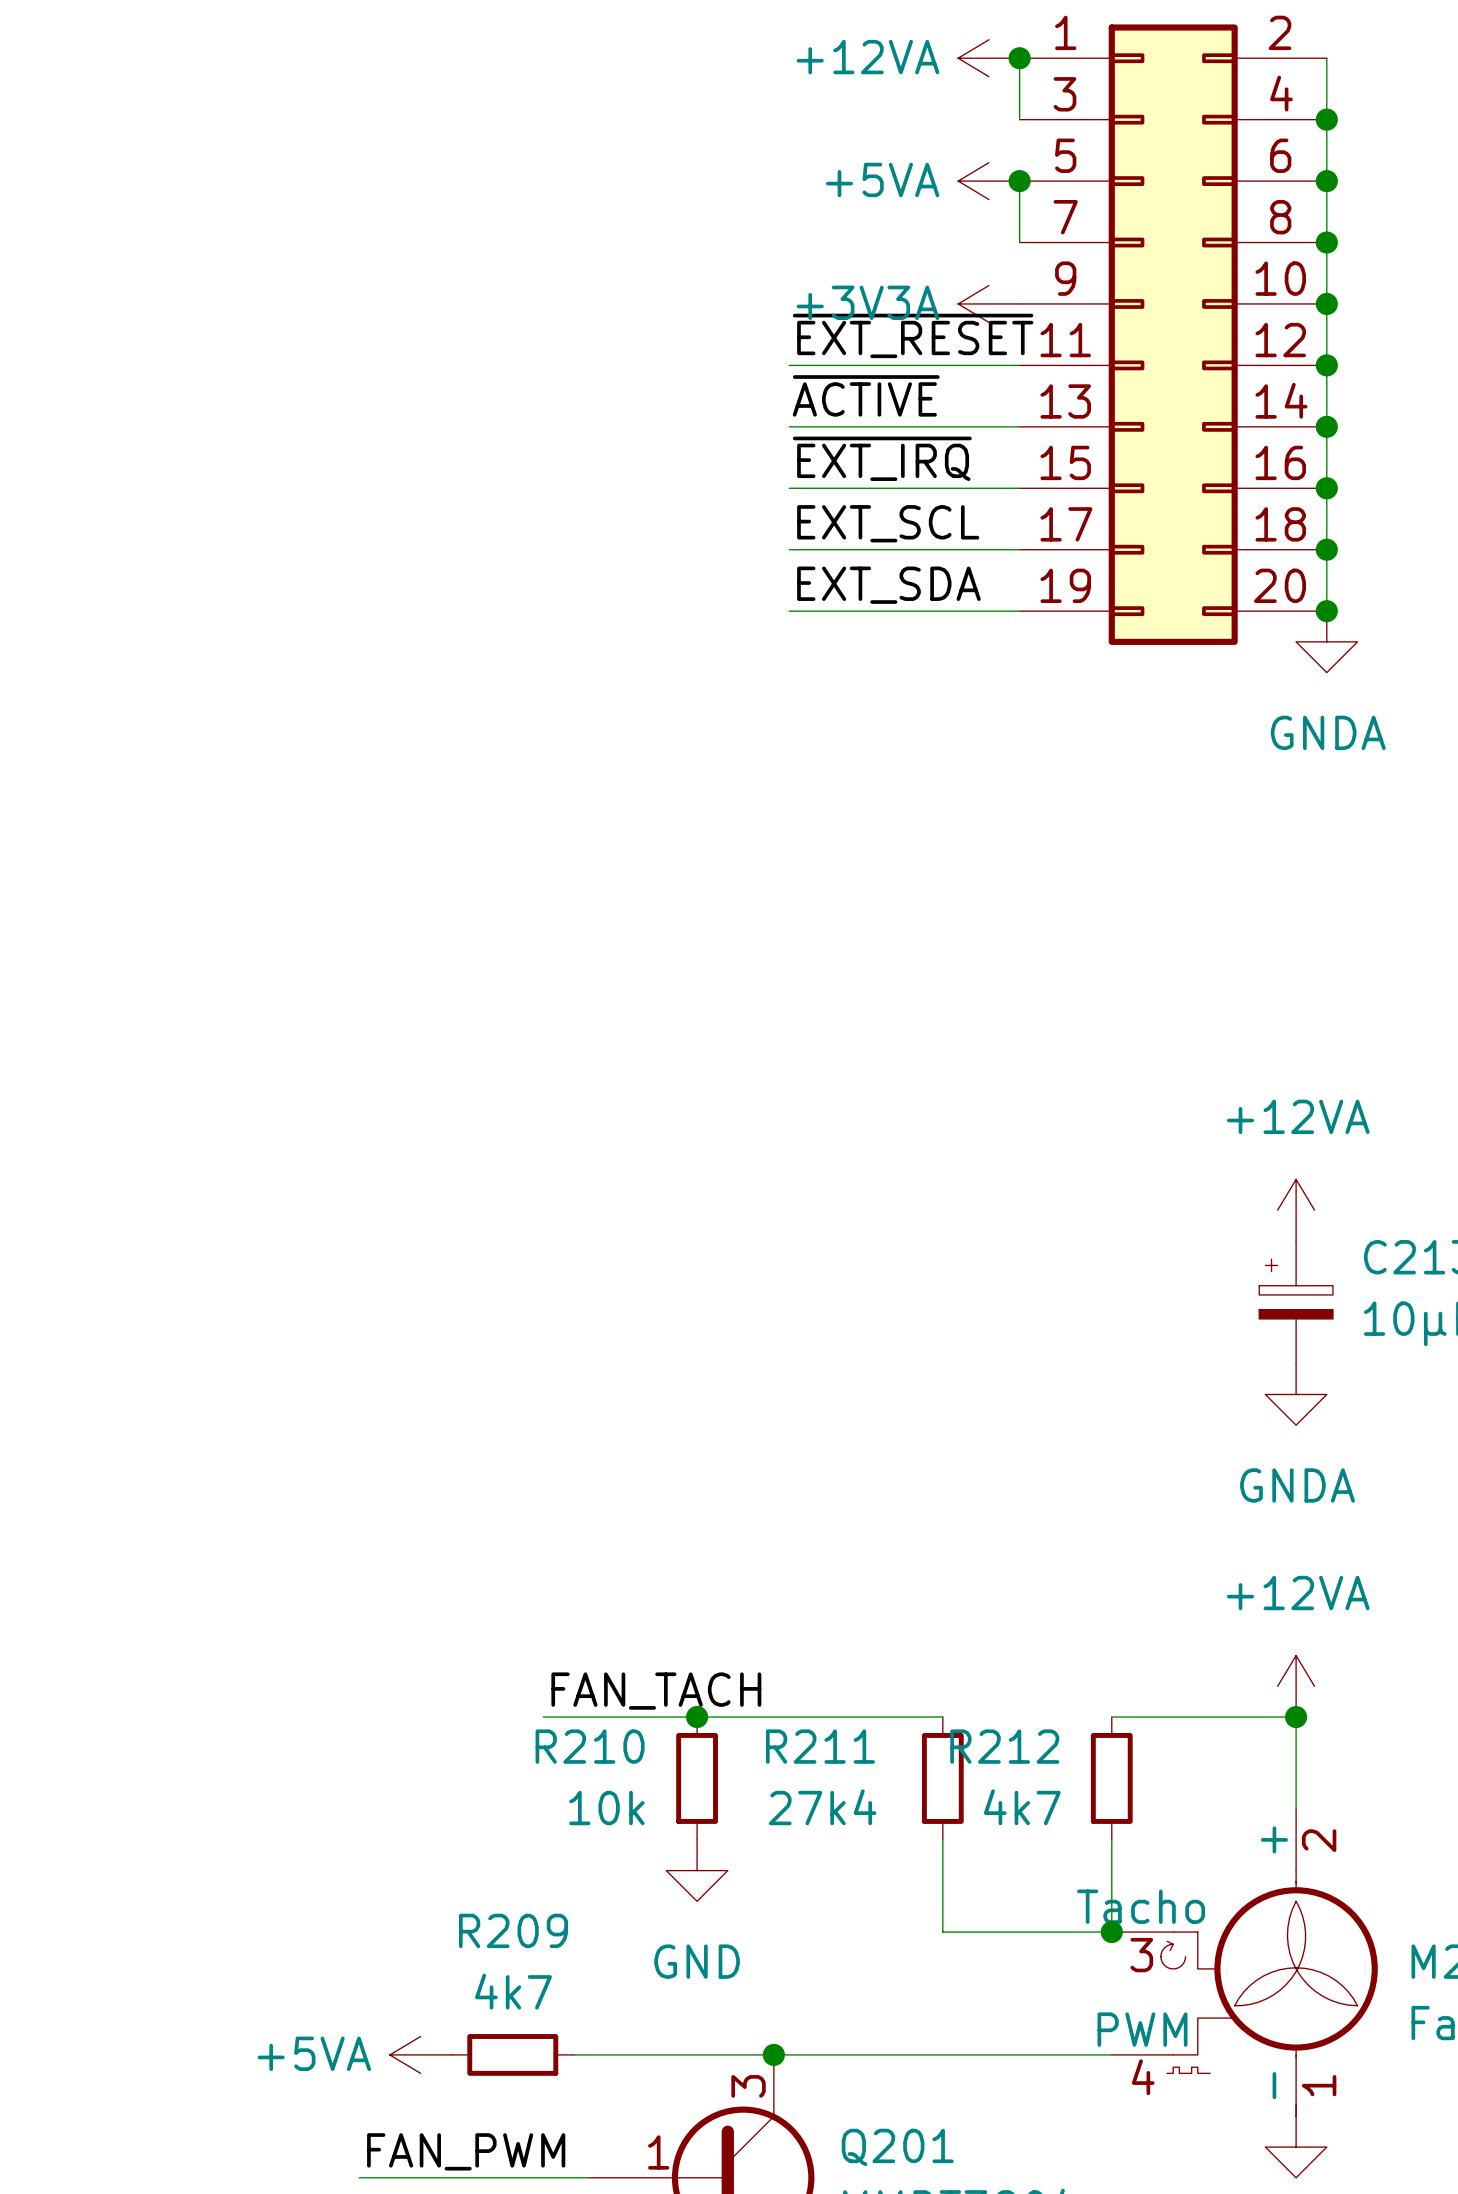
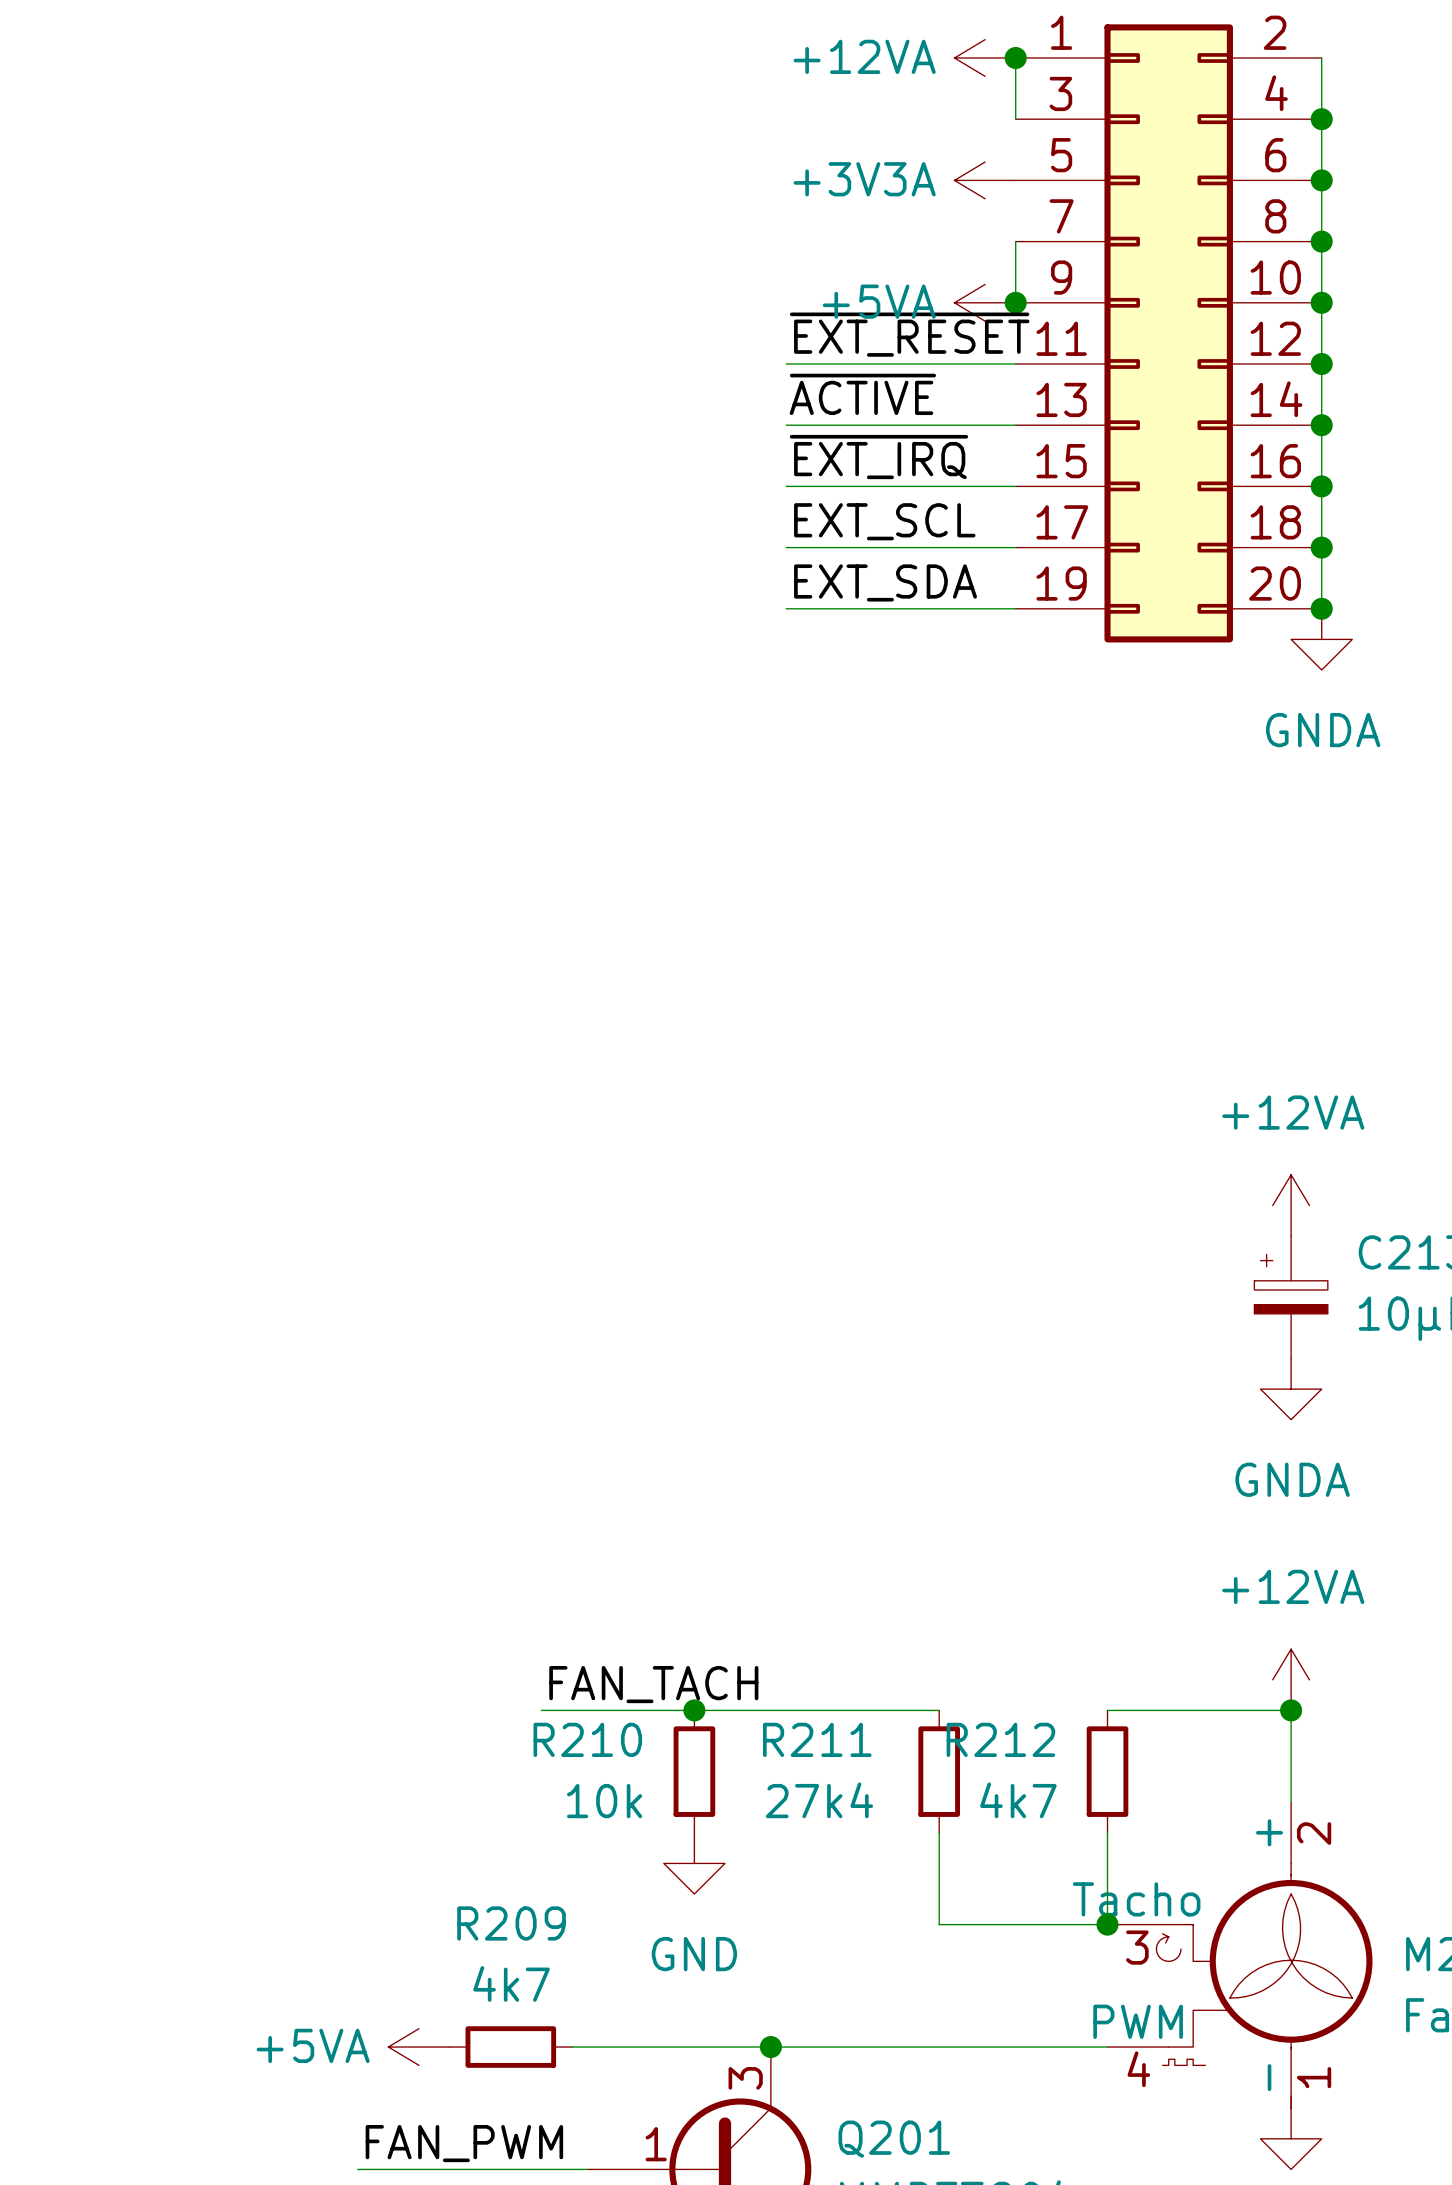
power symbol: +5VA (988, 181) -> +3V3A (985, 180)
wire: (1019, 181) (1019, 242) -> (1015, 302) (1015, 241)
junction position: (1019, 181) -> (1015, 302)
power symbol: +3V3A (988, 303) -> +5VA (985, 302)

